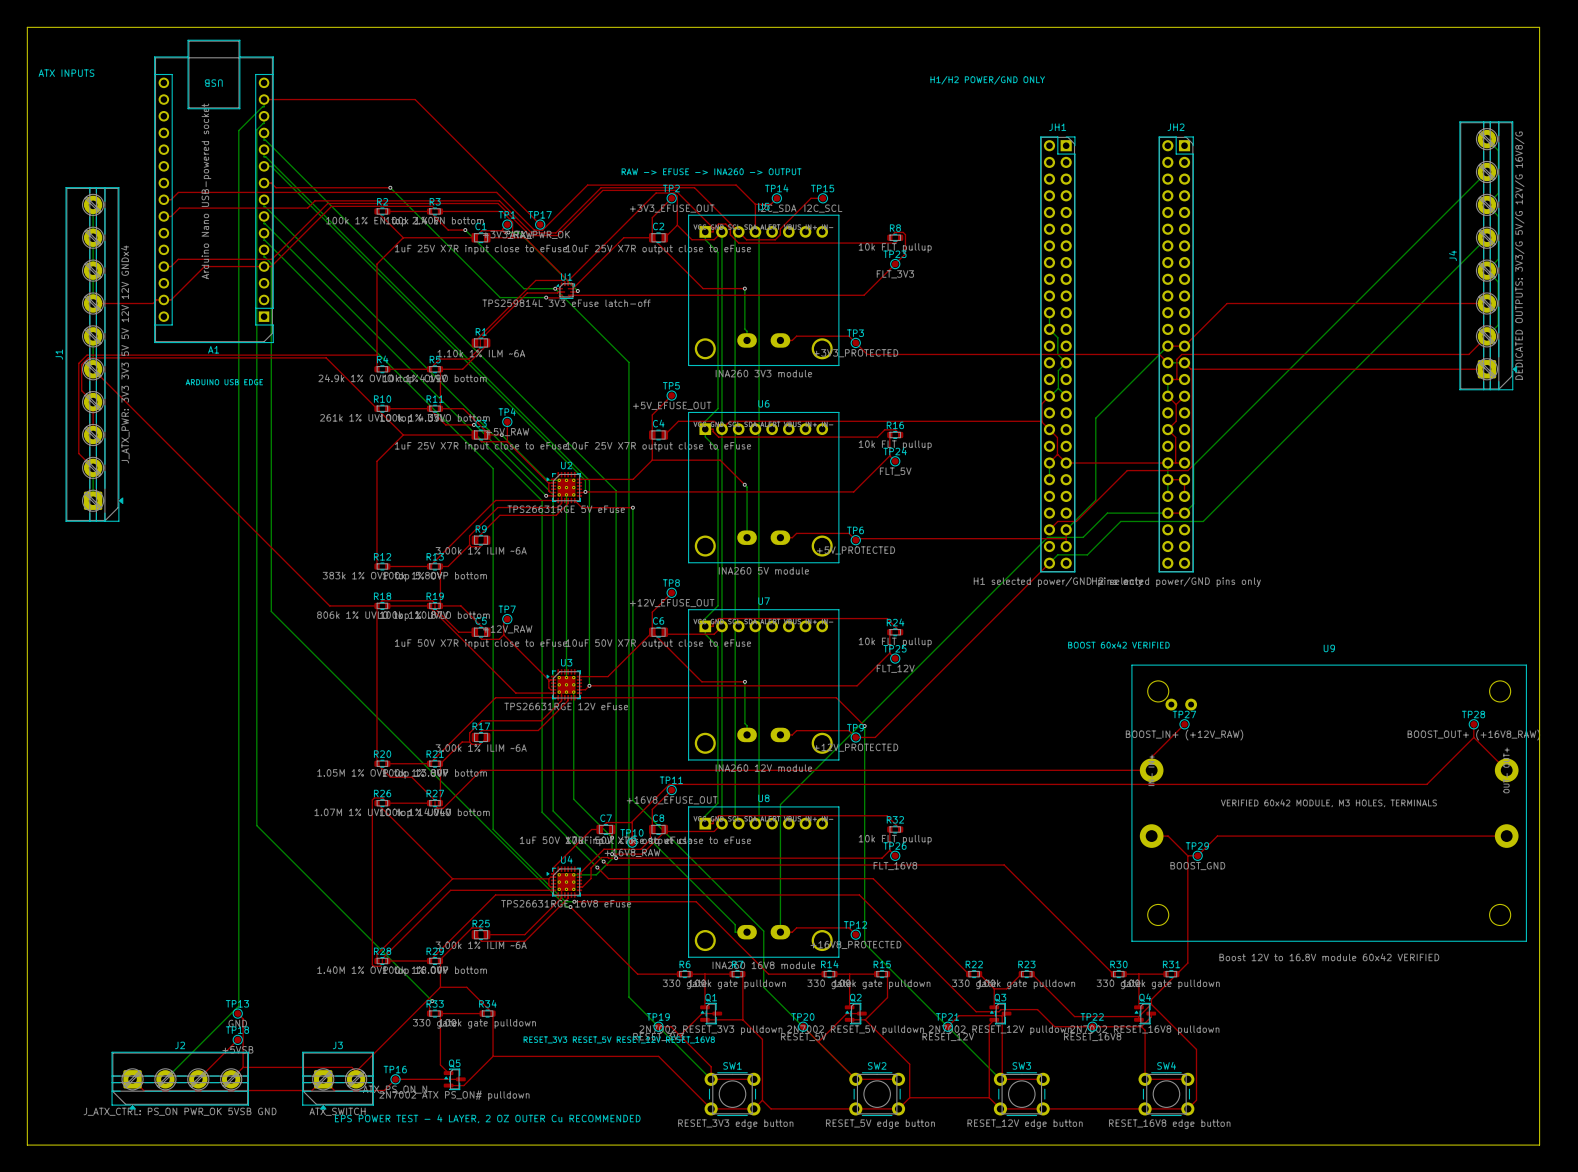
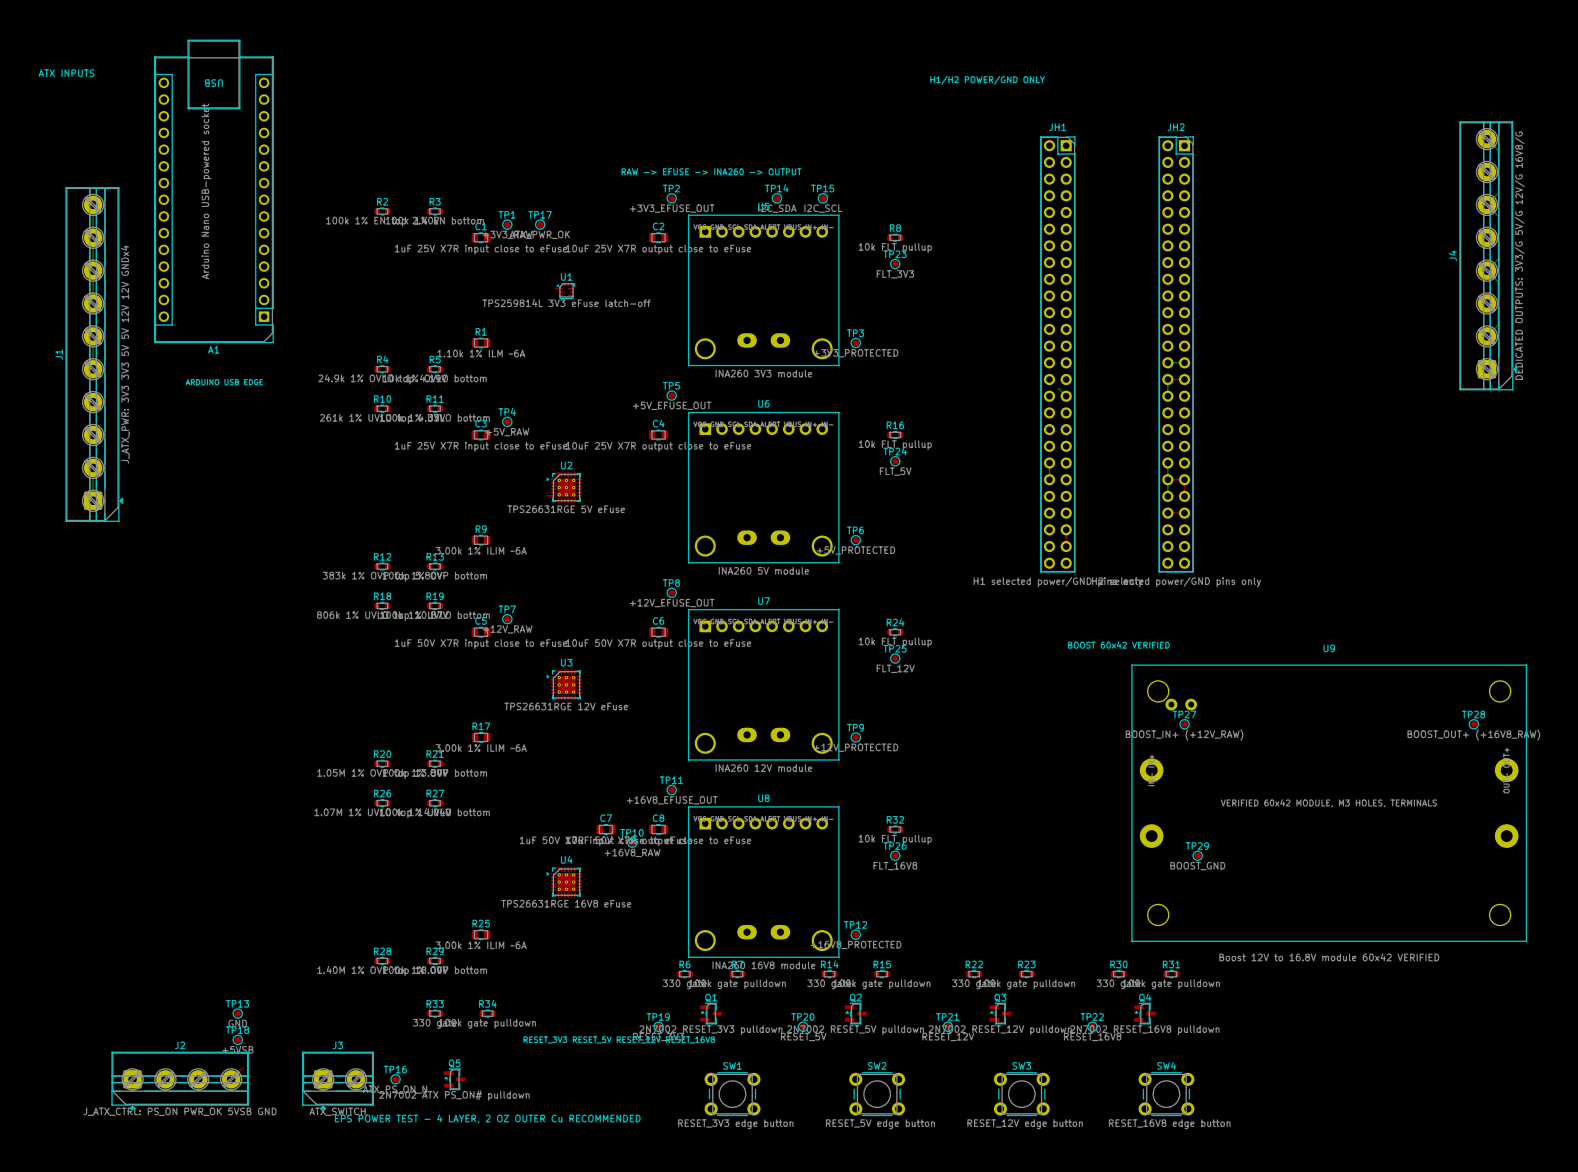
board edge: (27, 27) (1539, 27) (1539, 1145) (27, 1145) (27, 27) -> none
top track: (264, 99) (415, 99) (540, 224) -> none
bottom track: (264, 99) (264, 106) (238, 130) (238, 1005) (165, 1079) -> none
bottom track: (264, 116) (264, 123) (256, 129) (256, 825) (432, 1001) -> none
bottom track: (264, 132) (264, 140) (616, 490) (616, 858) -> none
bottom track: (264, 149) (264, 156) (589, 480) (589, 685) -> none
bottom track: (264, 166) (271, 166) (585, 480) (585, 491) -> none
bottom track: (1486, 172) (1193, 465) (1193, 503) (1184, 513) -> none
top track: (264, 183) (271, 183) (276, 187) (390, 187) -> none
bottom track: (390, 187) (500, 297) (546, 297) -> none
via: (390, 187) -> none
top track: (671, 198) (652, 217) (652, 237) -> none
top track: (776, 198) (770, 204) (755, 204) -> none
top track: (822, 198) (811, 198) (780, 229) (780, 234) (775, 239) (746, 239) (694, 187) (601, 187) (555, 232) (531, 232) (499, 200) (314, 200) (307, 208) (179, 208) (171, 216) (163, 216) -> none
top track: (163, 199) (171, 199) (178, 192) (496, 192) (534, 230) (542, 230) (587, 185) (736, 185) (755, 204) -> none
bottom track: (264, 199) (264, 206) (553, 494) (553, 811) (603, 861) -> none
top track: (755, 204) (755, 231) -> none
top track: (376, 211) (403, 237) -> none
top track: (387, 211) (429, 211) (448, 230) (465, 230) -> none
bottom track: (264, 216) (264, 223) (542, 500) (542, 812) (597, 867) -> none
top track: (507, 224) (502, 230) -> none
top track: (677, 225) (691, 239) (714, 239) (721, 231) -> none
top track: (677, 225) (677, 196) (674, 193) (656, 193) (568, 280) -> none
top track: (677, 225) (664, 237) -> none
top track: (713, 228) (675, 190) (602, 190) (557, 235) (530, 235) (498, 203) (327, 203) (271, 259) (178, 259) (171, 266) (163, 266) -> none
bottom track: (465, 230) (523, 288) (555, 288) (628, 362) (628, 997) (711, 1079) -> none
via: (465, 230) -> none
top track: (502, 230) (481, 230) (474, 237) (403, 237) -> none
top track: (502, 230) (508, 232) -> none
top track: (705, 231) (713, 231) (718, 224) (725, 224) (730, 228) (730, 234) (738, 243) (895, 243) (900, 237) -> none
bottom track: (705, 231) (705, 239) (718, 252) (718, 408) (705, 421) (705, 436) (718, 449) (718, 605) (705, 618) (705, 634) (717, 646) (717, 803) (705, 815) (705, 823) -> none
bottom track: (721, 231) (721, 823) -> none
bottom track: (738, 231) (735, 235) (735, 425) (738, 429) (735, 432) (735, 622) (738, 626) (735, 629) (735, 820) (738, 823) -> none
bottom track: (755, 231) (759, 235) (759, 425) (755, 429) (758, 432) (758, 622) (755, 626) (759, 630) (759, 819) (755, 823) -> none
bottom track: (508, 232) (519, 232) (577, 290) -> none
via: (508, 232) -> none
bottom track: (264, 233) (264, 240) (493, 468) (493, 829) (565, 901) (574, 901) -> none
top track: (403, 237) (376, 264) (376, 369) -> none
top track: (487, 237) (524, 237) (568, 280) -> none
top track: (512, 237) (512, 222) (501, 211) (440, 211) (432, 206) (331, 206) (271, 266) (204, 266) (171, 299) (156, 299) (153, 303) (93, 303) -> none
top track: (652, 237) (623, 237) (571, 288) -> none
top track: (652, 237) (703, 288) (744, 288) -> none
top track: (889, 237) (895, 232) (903, 232) (905, 234) (905, 253) (864, 295) (571, 295) (568, 297) (546, 297) -> none
bottom track: (1486, 237) (1203, 521) (1120, 521) (1087, 554) (1057, 554) (1049, 563) -> none
bottom track: (264, 249) (264, 257) (271, 263) (271, 611) (566, 906) (570, 906) -> none
top track: (568, 280) (568, 284) -> none
top track: (564, 284) (563, 280) (535, 280) (475, 342) -> none
via: (555, 288) -> none
bottom track: (744, 288) (744, 329) (747, 331) (747, 340) -> none
via: (744, 288) -> none
top track: (577, 290) (572, 291) -> none
via: (577, 290) -> none
top track: (561, 291) (527, 292) (480, 339) (480, 347) (468, 359) (439, 359) (429, 369) (387, 369) -> none
via: (546, 297) -> none
top track: (1486, 303) (1227, 303) (1184, 346) (1167, 346) -> none
bottom track: (1049, 312) (1049, 329) (1057, 337) (1057, 354) (1066, 362) (1058, 370) (1058, 388) (1049, 396) -> none
top track: (1486, 336) (1468, 354) (1181, 354) (1176, 359) (1176, 379) -> none
top track: (780, 340) (792, 340) (796, 336) (849, 336) (867, 354) (1159, 354) (1167, 362) -> none
top track: (487, 342) (462, 369) (440, 369) (440, 408) (463, 408) (487, 432) (487, 434) (501, 434) -> none
bottom track: (1167, 346) (1095, 418) (1095, 500) (1066, 529) -> none
top track: (376, 355) (87, 355) (78, 363) (78, 453) (93, 467) -> none
top track: (1184, 362) (1190, 369) (1486, 369) -> none
top track: (93, 369) (329, 605) (376, 605) -> none
top track: (1192, 369) (1192, 466) (1188, 470) (1127, 470) (1076, 521) (1057, 521) (1049, 529) -> none
top track: (671, 395) (652, 414) (652, 460) -> none
top track: (1049, 396) (1041, 403) (1041, 422) (1057, 437) (1057, 454) -> none
top track: (1167, 396) (1176, 404) -> none
top track: (1184, 396) (1176, 404) -> none
top track: (1176, 404) (1176, 421) (1167, 429) (1175, 437) (1175, 463) -> none
top track: (387, 408) (429, 408) (445, 424) (473, 424) -> none
top track: (507, 421) (507, 441) -> none
top track: (1041, 421) (729, 421) (721, 429) (714, 421) (678, 421) (664, 435) -> none
bottom track: (473, 424) (546, 495) -> none
via: (473, 424) -> none
top track: (705, 429) (713, 429) (718, 437) (877, 437) (884, 429) (895, 429) (900, 435) -> none
bottom track: (501, 434) (547, 480) (559, 480) -> none
via: (501, 434) -> none
top track: (93, 435) (93, 402) (81, 390) (81, 364) (88, 357) (326, 357) (403, 435) -> none
top track: (403, 435) (474, 435) (481, 441) (507, 441) -> none
top track: (403, 435) (376, 461) (376, 566) -> none
top track: (889, 435) (889, 455) -> none
top track: (507, 441) (548, 483) (553, 483) (553, 479) -> none
top track: (1057, 454) (1066, 463) (1184, 463) -> none
top track: (1057, 454) (1049, 463) -> none
top track: (889, 455) (895, 461) -> none
top track: (889, 455) (853, 491) (579, 492) -> none
top track: (652, 460) (633, 479) (579, 479) (579, 482) -> none
top track: (652, 460) (720, 460) (744, 484) -> none
top track: (548, 483) (548, 490) (553, 492) -> none
bottom track: (744, 484) (747, 487) (747, 537) -> none
via: (744, 484) -> none
bottom track: (566, 487) (566, 692) -> none
via: (585, 491) -> none
top track: (561, 494) (561, 503) (557, 507) (497, 507) (469, 535) (469, 545) -> none
via: (546, 495) -> none
top track: (558, 500) (495, 500) (429, 566) (387, 566) -> none
top track: (568, 500) (568, 503) (556, 515) (499, 515) (475, 540) -> none
top track: (574, 500) (581, 507) (632, 507) -> none
bottom track: (632, 507) (632, 800) (763, 931) (763, 987) (855, 1079) -> none
via: (632, 507) -> none
bottom track: (1167, 513) (1107, 513) (1083, 537) (1047, 537) (780, 804) (780, 932) -> none
top track: (780, 537) (792, 537) (796, 533) (849, 533) (855, 540) (857, 538) (1066, 538) -> none
top track: (487, 540) (480, 546) (469, 545) -> none
top track: (469, 545) (448, 566) (440, 566) (440, 605) (460, 605) (487, 632) -> none
top track: (1049, 563) (875, 737) (855, 737) (849, 730) (796, 730) (792, 734) (780, 734) -> none
top track: (671, 592) (652, 612) (652, 632) -> none
top track: (376, 605) (376, 763) (390, 777) (411, 777) (435, 800) (435, 805) (437, 808) (443, 808) (481, 770) (1151, 770) (1151, 757) (1184, 724) -> none
top track: (376, 605) (382, 600) (432, 600) (435, 603) (435, 608) (458, 632) (474, 632) (481, 639) (499, 639) (503, 634) -> none
top track: (387, 605) (429, 605) (515, 693) (553, 693) -> none
top track: (507, 619) (503, 622) (503, 634) -> none
top track: (705, 626) (713, 626) (718, 618) (886, 618) (900, 632) -> none
top track: (721, 626) (714, 634) (666, 634) (664, 632) -> none
top track: (652, 632) (607, 676) (579, 676) (579, 679) -> none
top track: (652, 632) (701, 681) (744, 681) -> none
top track: (889, 632) (889, 653) -> none
top track: (503, 634) (549, 680) -> none
top track: (889, 653) (857, 685) (589, 685) (585, 689) (579, 689) -> none
top track: (889, 653) (895, 658) -> none
top track: (553, 676) (553, 679) (548, 681) (548, 687) (553, 689) -> none
bottom track: (573, 677) (573, 799) (612, 837) (612, 859) (596, 874) (573, 874) (573, 889) -> none
bottom track: (744, 681) (744, 723) (747, 725) (747, 734) -> none
via: (744, 681) -> none
via: (589, 685) -> none
top track: (561, 692) (561, 700) (541, 720) (481, 720) (469, 733) (469, 742) -> none
top track: (558, 697) (495, 697) (429, 763) (387, 763) -> none
top track: (568, 697) (568, 700) (538, 730) (481, 730) (475, 737) -> none
top track: (574, 697) (836, 697) (864, 726) -> none
top track: (1473, 724) (1473, 737) -> none
bottom track: (864, 726) (864, 943) (1000, 1079) -> none
via: (864, 726) -> none
top track: (487, 737) (480, 744) (471, 744) (469, 742) -> none
top track: (1473, 737) (1426, 784) (669, 784) (632, 821) (632, 842) -> none
top track: (1473, 737) (1506, 770) -> none
top track: (469, 742) (462, 742) (440, 763) (440, 803) -> none
top track: (671, 790) (652, 809) (650, 839) (640, 849) (603, 849) (579, 873) (579, 877) -> none
top track: (376, 803) (452, 878) -> none
top track: (429, 803) (387, 803) (382, 798) (374, 798) (372, 799) (373, 966) (379, 966) (382, 963) (382, 958) (450, 890) (553, 890) -> none
top track: (632, 822) (606, 822) (599, 829) (591, 829) (553, 867) (553, 877) (548, 878) -> none
top track: (705, 823) (713, 823) (718, 815) (886, 815) (900, 829) -> none
top track: (721, 823) (714, 831) (665, 830) -> none
top track: (889, 829) (889, 850) -> none
top track: (665, 830) (642, 854) (612, 854) -> none
top track: (1151, 836) (1168, 836) (1187, 855) -> none
top track: (1506, 836) (1217, 836) (1197, 855) (1187, 855) -> none
via: (612, 837) -> none
bottom track: (650, 839) (735, 924) (735, 932) (747, 932) -> none
via: (650, 839) -> none
top track: (889, 850) (895, 855) -> none
top track: (889, 850) (882, 858) (601, 857) (591, 868) (591, 878) (582, 887) (579, 887) -> none
via: (612, 854) -> none
top track: (1187, 855) (1187, 963) (1151, 999) (1151, 1004) -> none
via: (616, 858) -> none
top track: (603, 861) (607, 865) (1004, 865) (1113, 974) -> none
via: (603, 861) -> none
top track: (597, 867) (608, 878) (873, 878) (968, 974) -> none
via: (597, 867) -> none
top track: (452, 878) (548, 878) -> none
top track: (452, 878) (376, 954) (376, 960) -> none
top track: (548, 878) (548, 885) (553, 887) -> none
top track: (561, 889) (561, 897) (524, 934) (487, 934) (480, 927) (471, 927) (440, 959) (440, 987) -> none
top track: (558, 894) (495, 894) (429, 960) (387, 960) -> none
top track: (568, 894) (568, 898) (524, 941) (481, 941) (475, 934) -> none
top track: (574, 894) (859, 894) (976, 1011) (1037, 1009) (1054, 1026) (1141, 1026) -> none
top track: (574, 901) (696, 901) (768, 974) (824, 974) -> none
via: (574, 901) -> none
top track: (570, 906) (637, 974) (679, 974) -> none
via: (570, 906) -> none
top track: (780, 932) (792, 932) (796, 927) (849, 927) (855, 934) -> none
top track: (690, 974) (732, 974) -> none
top track: (704, 974) (704, 1007) -> none
top track: (742, 974) (742, 1019) -> none
top track: (834, 974) (876, 974) -> none
top track: (849, 974) (849, 1007) -> none
top track: (887, 974) (887, 997) (865, 1019) -> none
top track: (979, 974) (994, 988) -> none
top track: (1021, 974) (1006, 988) (994, 988) -> none
top track: (1032, 974) (1074, 1016) (1138, 1016) (1151, 1004) -> none
top track: (1124, 974) (1165, 974) -> none
top track: (1138, 974) (1138, 1007) -> none
top track: (440, 987) (356, 1071) -> none
top track: (440, 987) (466, 987) (493, 1013) (493, 1056) -> none
top track: (994, 988) (994, 1007) -> none
via: (432, 1001) -> none
top track: (1151, 1004) (1196, 1049) (1196, 1100) (1187, 1108) (1000, 1108) (989, 1097) -> none
top track: (237, 1013) (243, 1018) (243, 1067) (351, 1067) (356, 1071) -> none
top track: (482, 1013) (440, 1013) (440, 1064) (448, 1073) -> none
top track: (717, 1013) (702, 1013) (680, 1035) -> none
top track: (861, 1013) (846, 1013) (818, 1041) -> none
top track: (1006, 1013) (1004, 1015) (958, 1015) (947, 1026) -> none
top track: (1151, 1013) (1151, 1016) (1141, 1026) -> none
top track: (1002, 1015) (1002, 1079) -> none
top track: (704, 1019) (742, 1019) -> none
top track: (742, 1019) (762, 1039) (762, 1100) -> none
top track: (849, 1019) (865, 1019) -> none
top track: (865, 1019) (909, 1064) (909, 1097) -> none
top track: (994, 1019) (989, 1024) (989, 1097) -> none
top track: (658, 1026) (671, 1026) (711, 1066) (711, 1079) (753, 1079) -> none
top track: (803, 1026) (818, 1041) -> none
top track: (1141, 1026) (1145, 1030) (1145, 1079) (1187, 1079) -> none
top track: (237, 1039) (198, 1079) -> none
top track: (818, 1041) (855, 1079) (898, 1079) -> none
top track: (493, 1056) (463, 1085) (448, 1085) -> none
top track: (493, 1056) (658, 1056) (711, 1108) (753, 1108) (762, 1100) -> none
top track: (132, 1079) (143, 1090) (312, 1090) (323, 1079) (334, 1090) (384, 1090) (395, 1079) (460, 1079) -> none
top track: (1000, 1079) (1043, 1079) -> none
top track: (909, 1097) (898, 1108) (771, 1108) (762, 1100) -> none
top track: (909, 1097) (989, 1097) -> none

